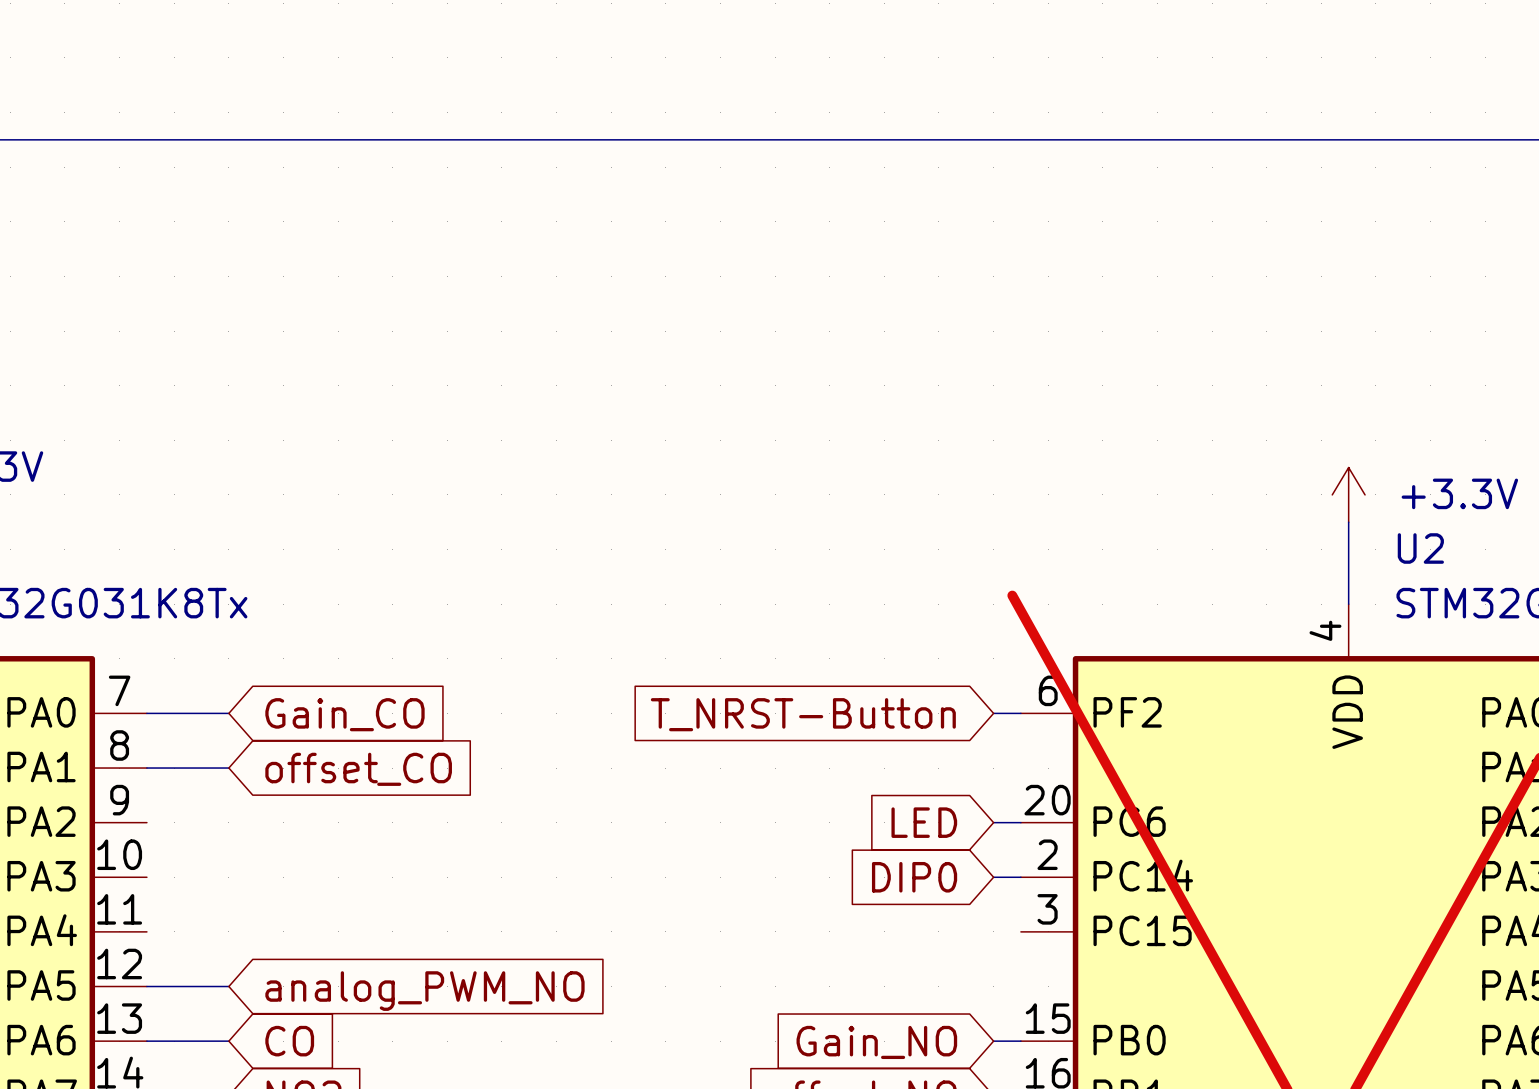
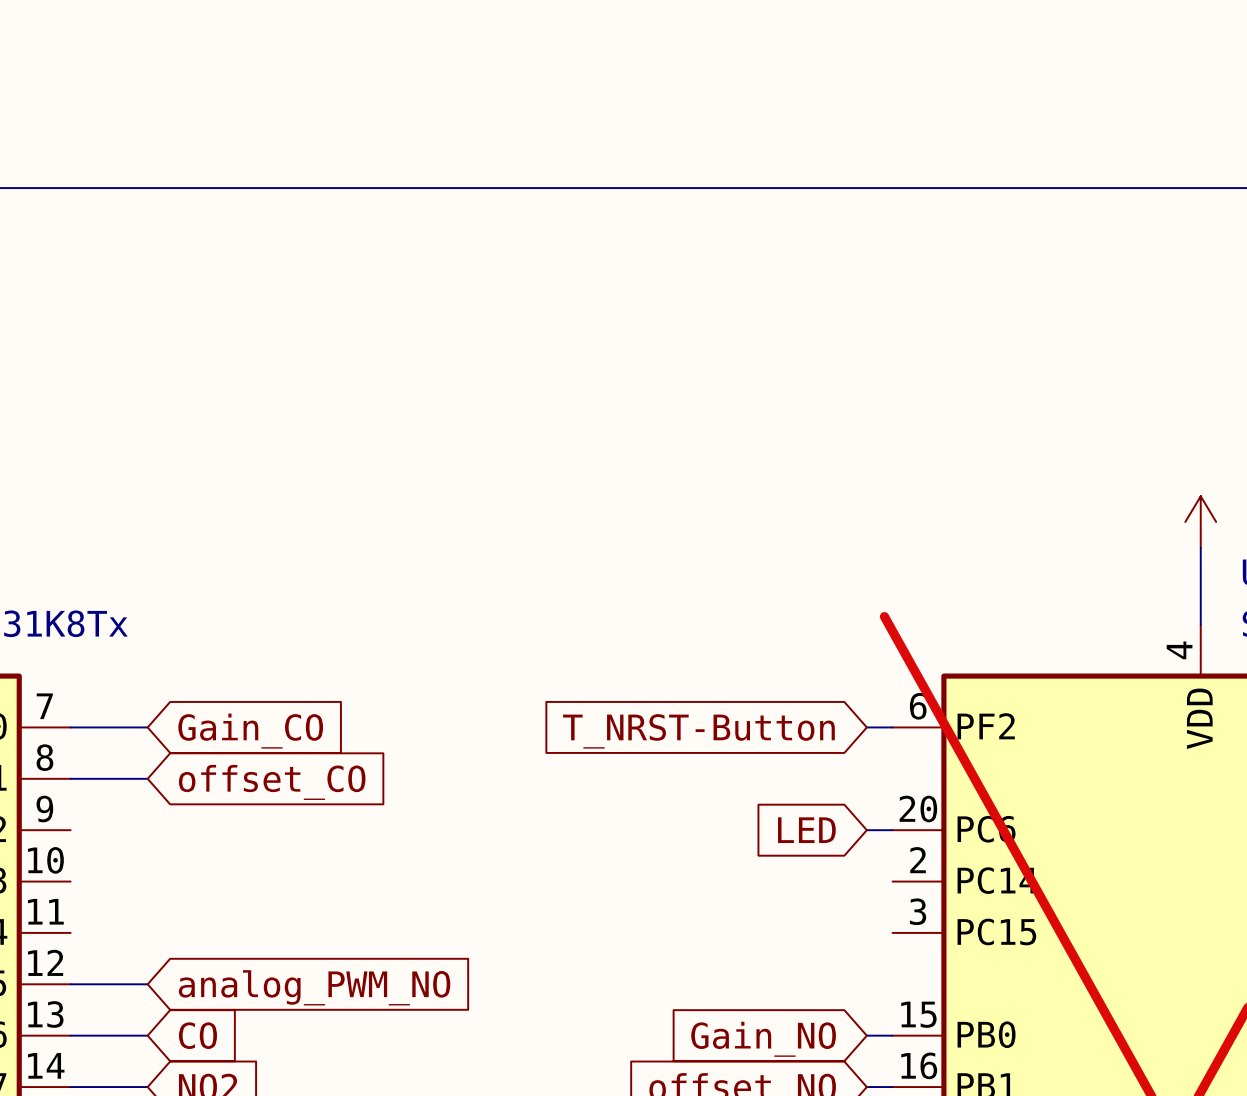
global label: DIP0 (914, 877) -> none
wire: (993, 877) (1020, 877) -> none

